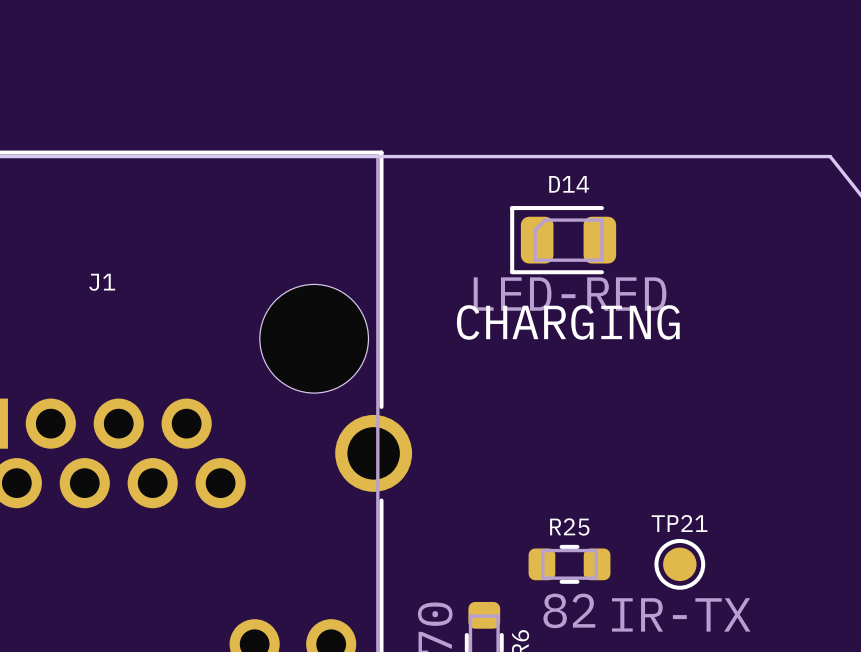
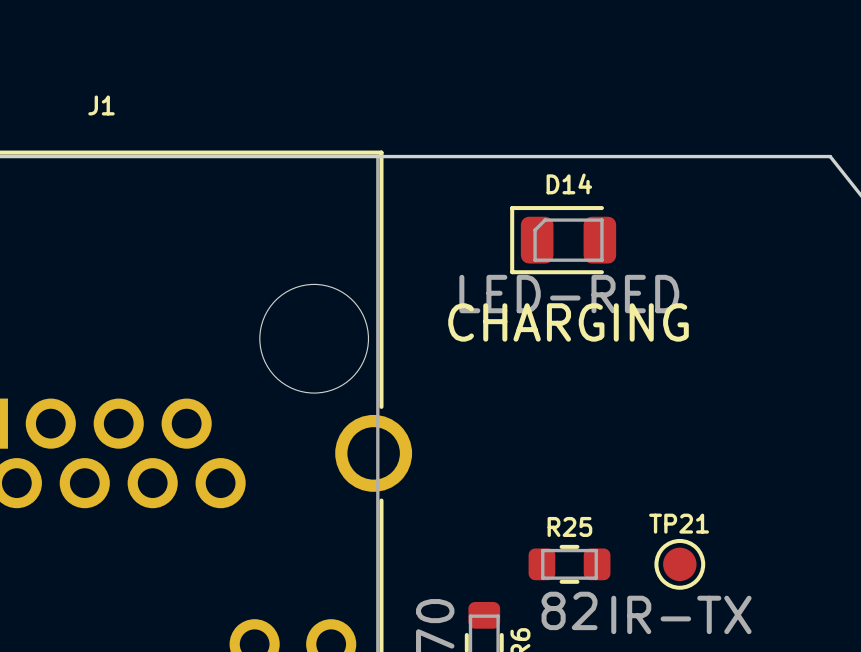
J1 name position: J1 (102, 282) -> J1 (101, 105)

